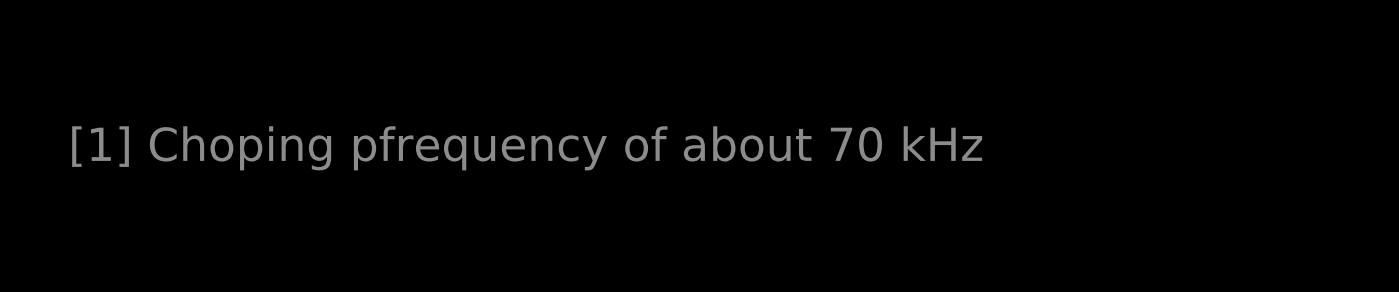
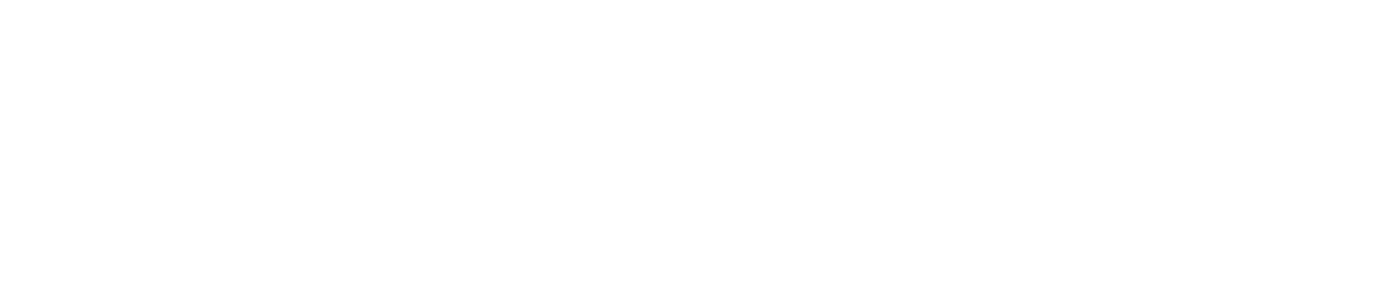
text: [1] Choping pfrequency of about 70 kHz (527, 148) -> none

